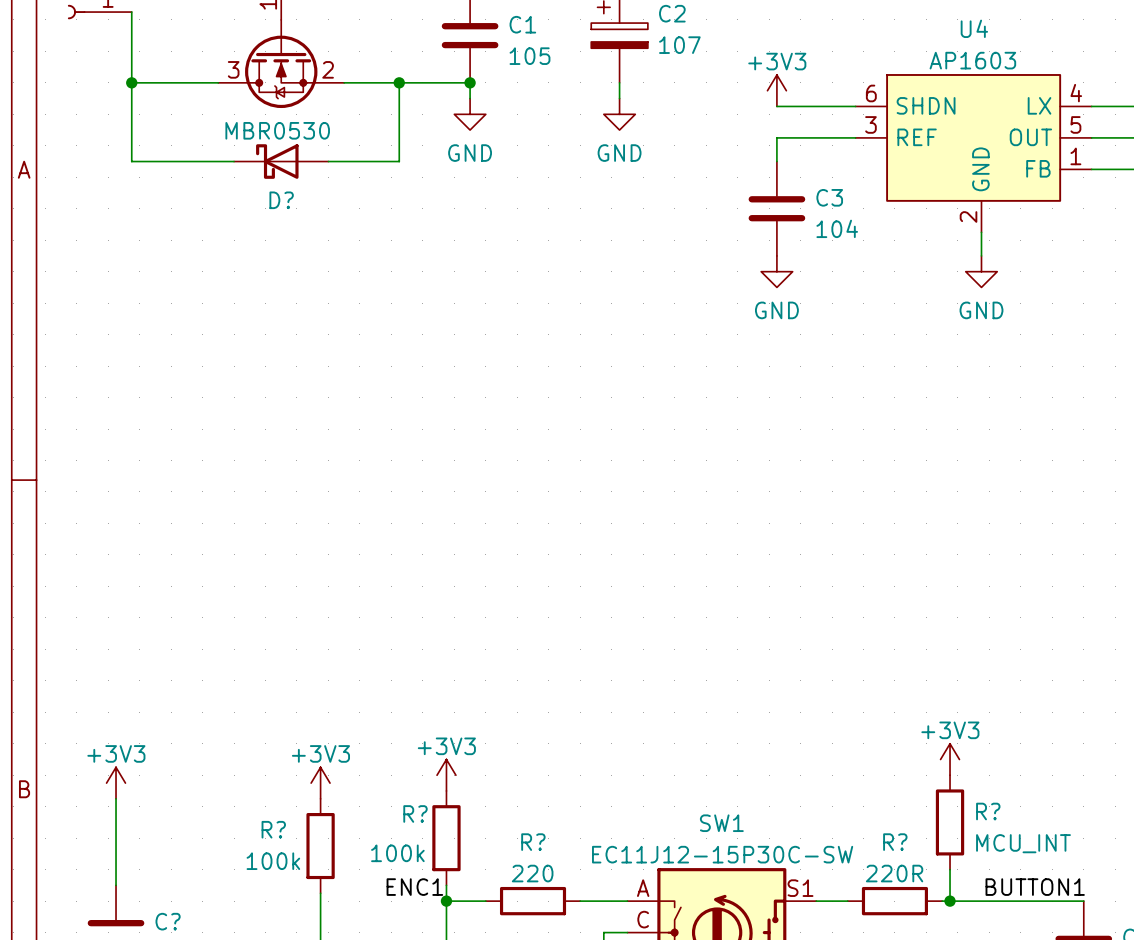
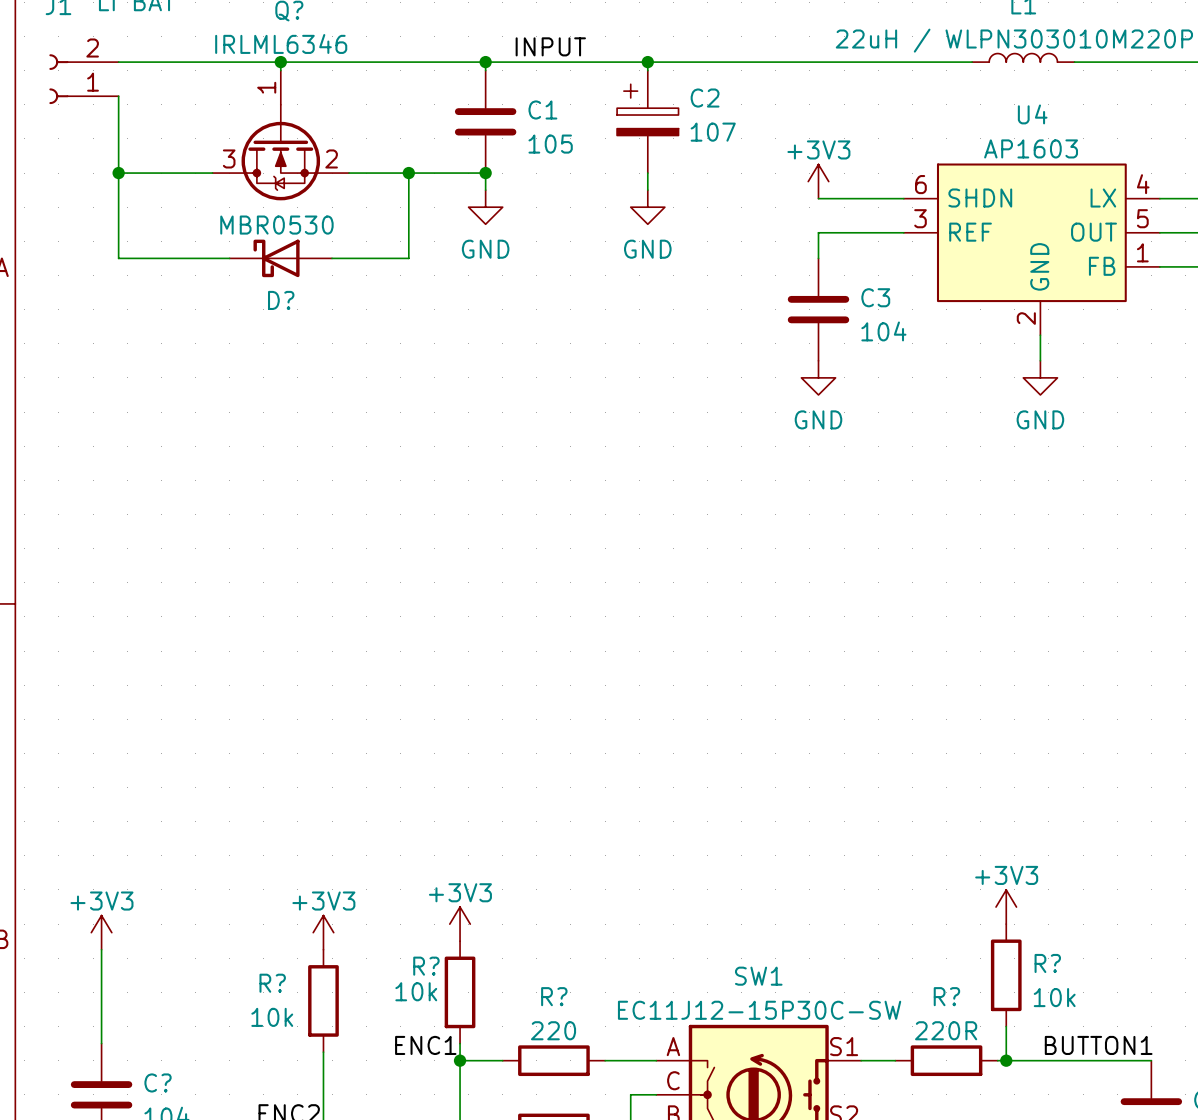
R? value: MCU_INT (1023, 843) -> 10k (1054, 997)
R? value: 100k (397, 853) -> 10k (416, 991)
R? value: 100k (273, 861) -> 10k (272, 1017)

